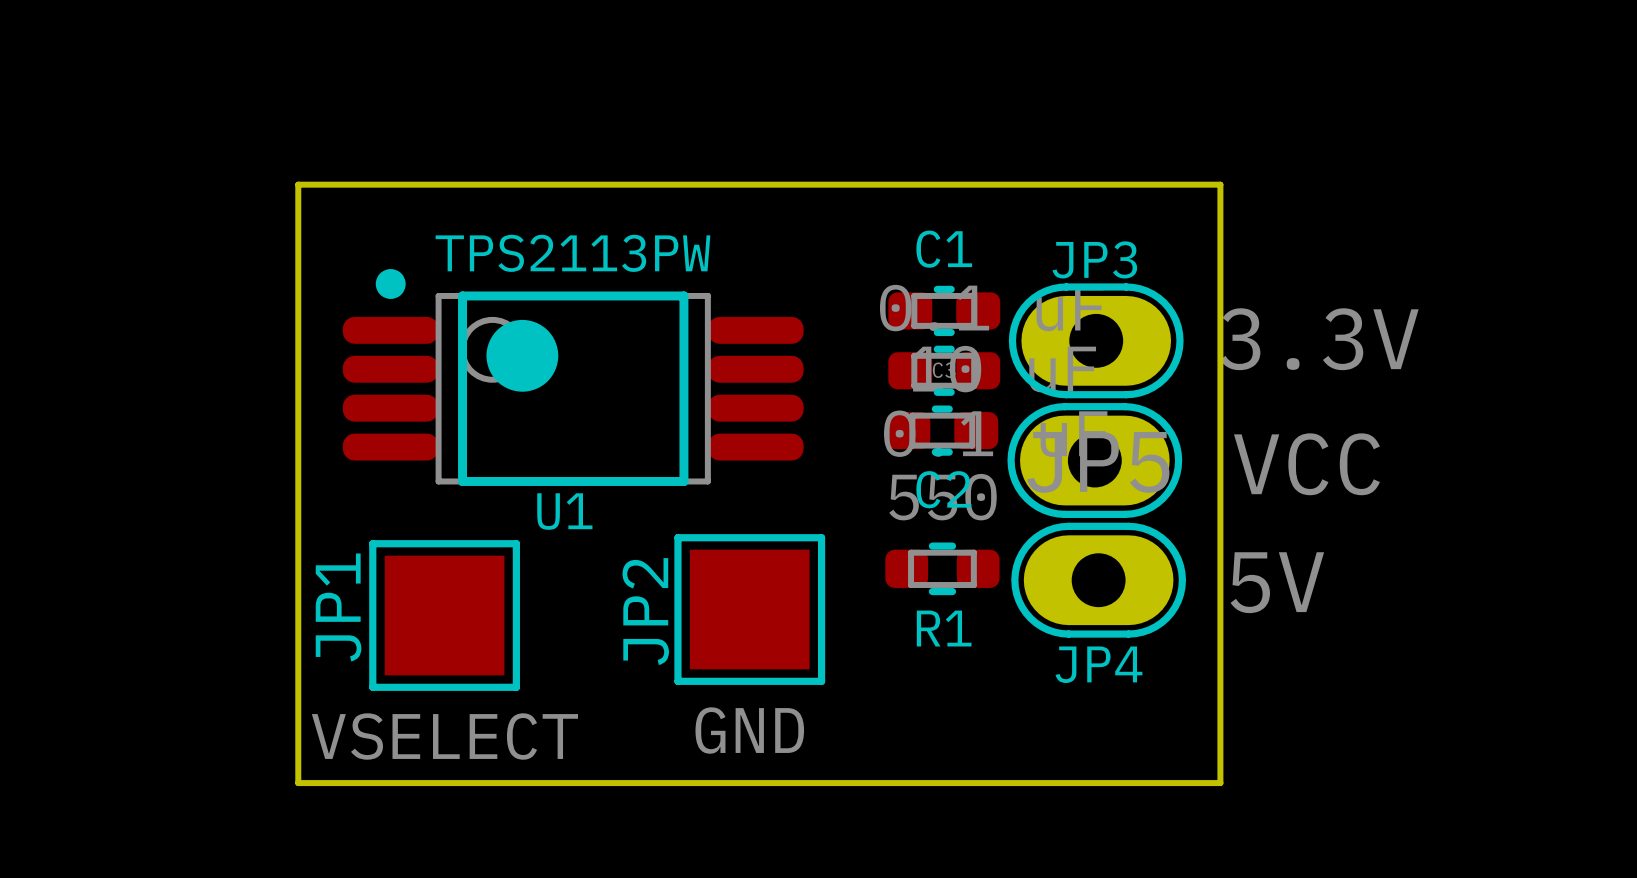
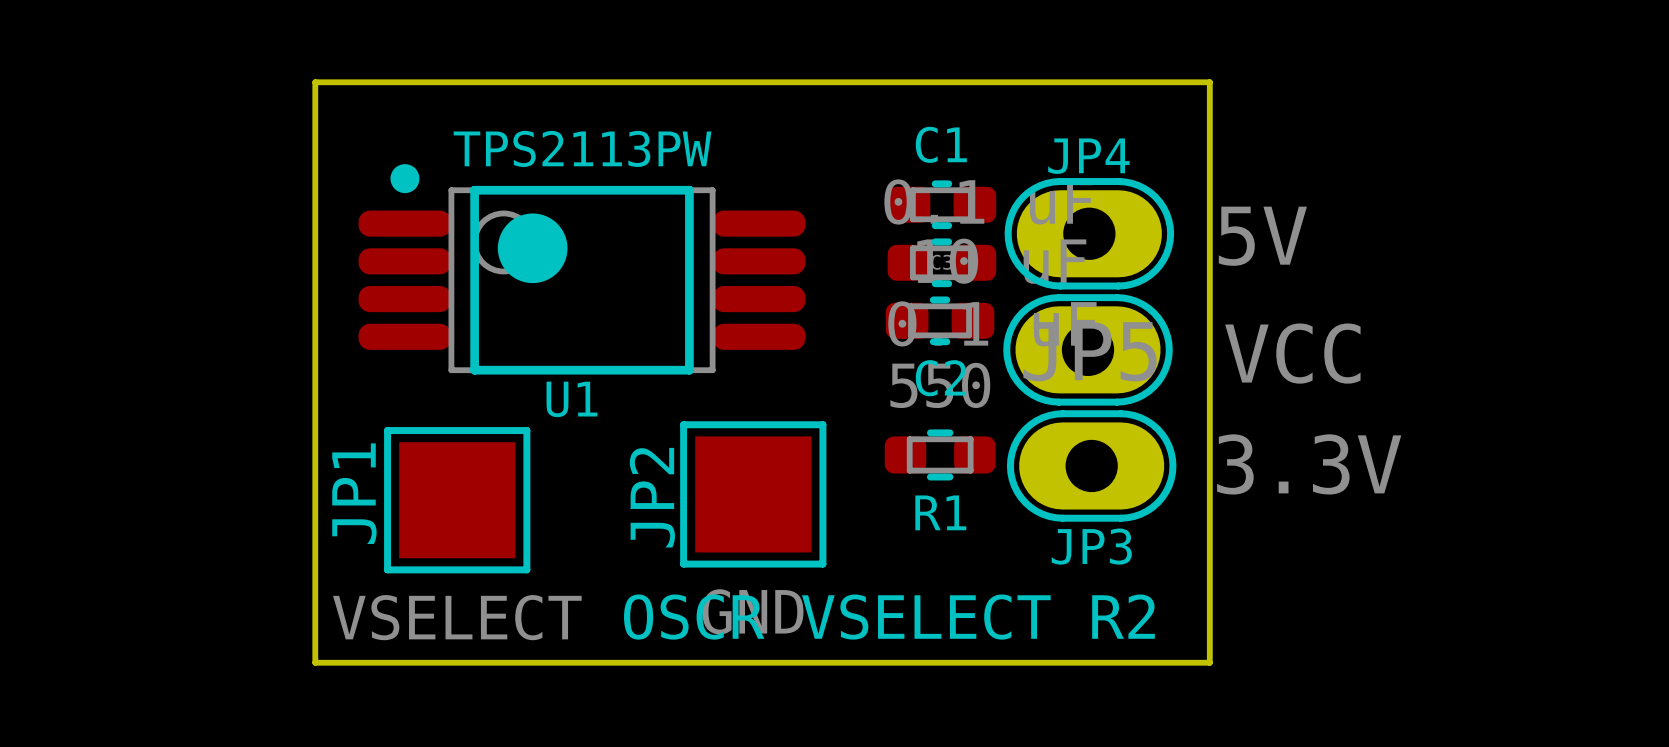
JP3 name: JP3 (1094, 259) -> JP4 (1088, 156)
JP3 value: 3.3V (1319, 339) -> 5V (1262, 236)
JP4 value: 5V (1277, 582) -> 3.3V (1309, 464)
JP4 name: JP4 (1098, 664) -> JP3 (1091, 546)
text: none -> OSCR VSELECT R2 (889, 617)

